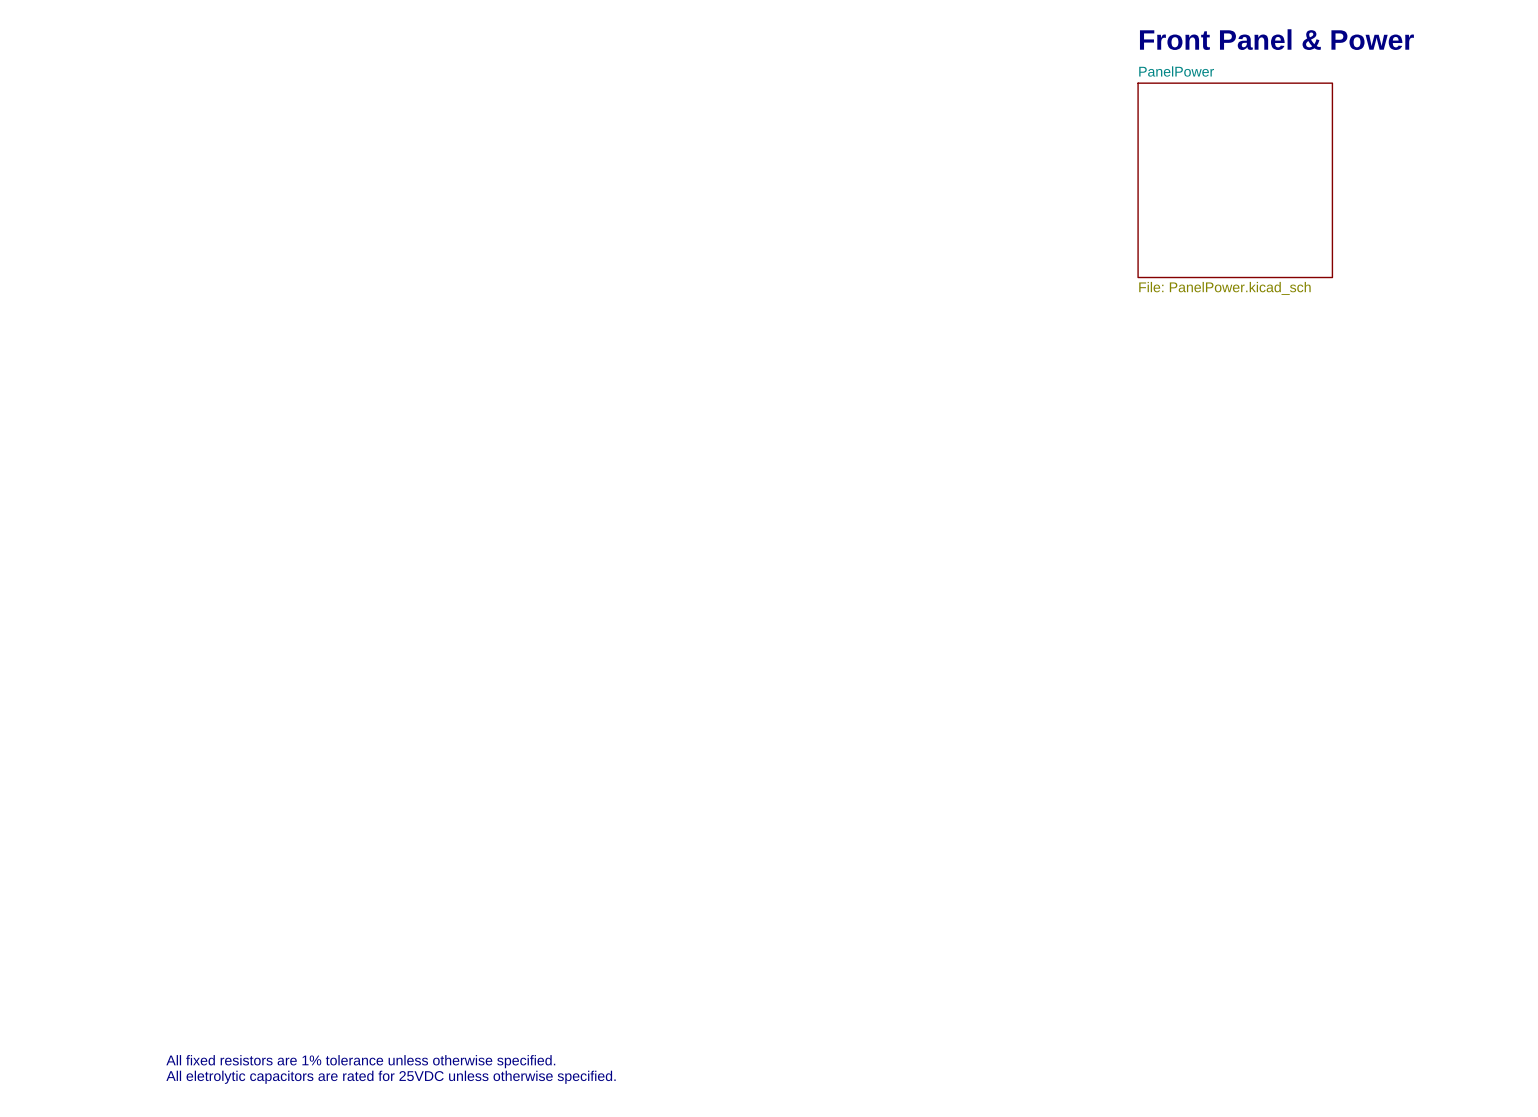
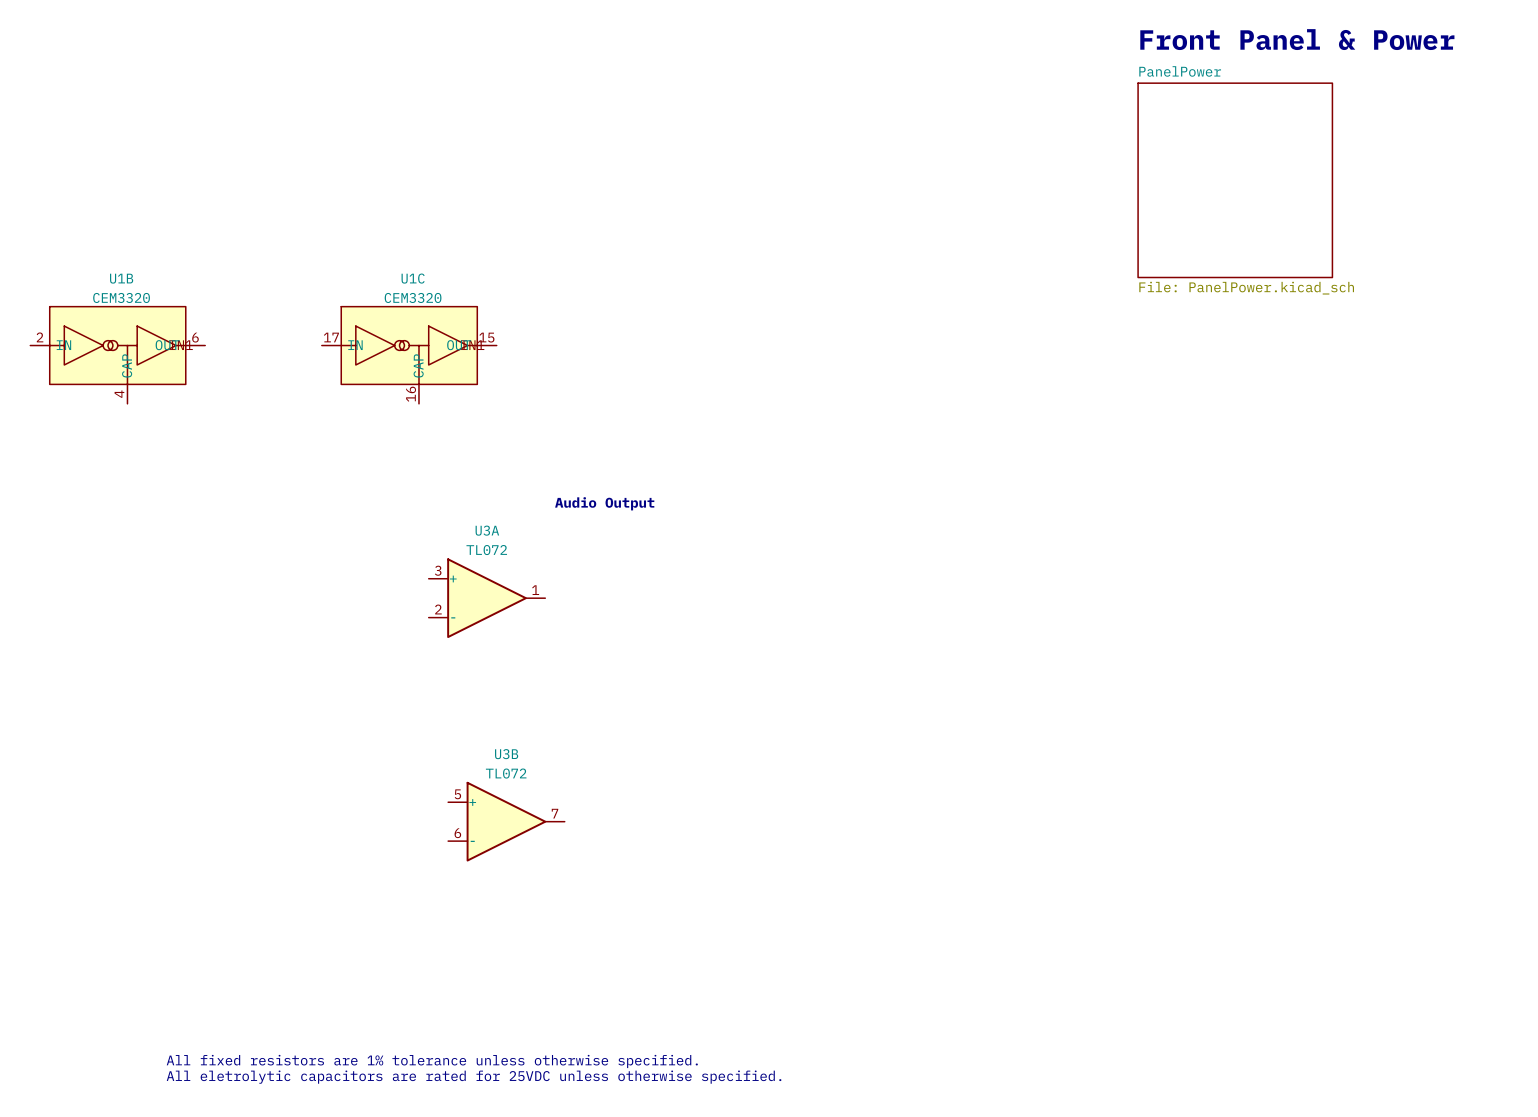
U1B: none -> CEM3320 (117, 355)
U1C: none -> CEM3320 (409, 355)
text: none -> Audio Output (604, 503)
U3A: none -> TL072 (487, 598)
U3B: none -> TL072 (506, 821)

